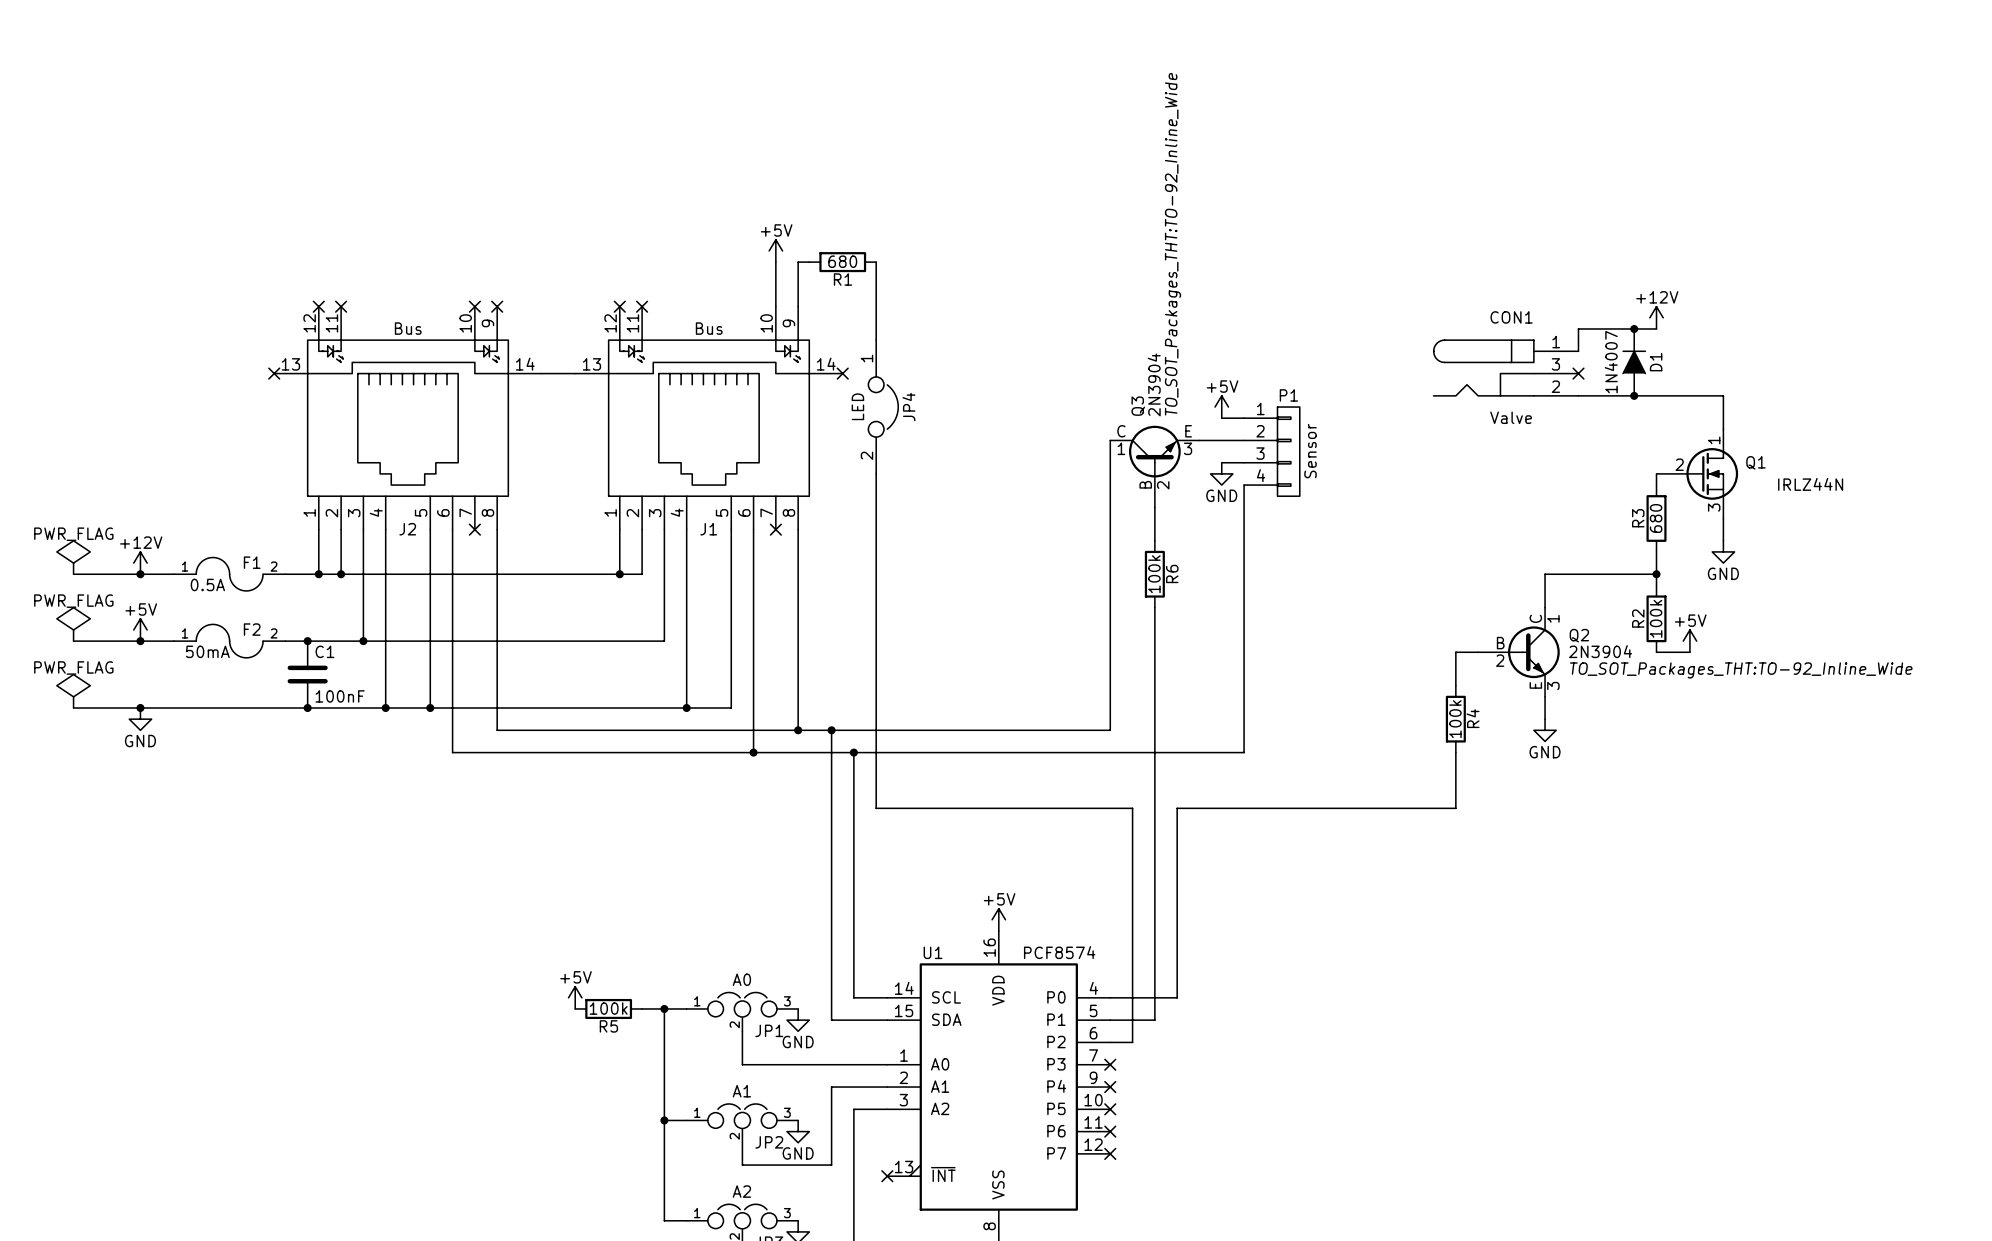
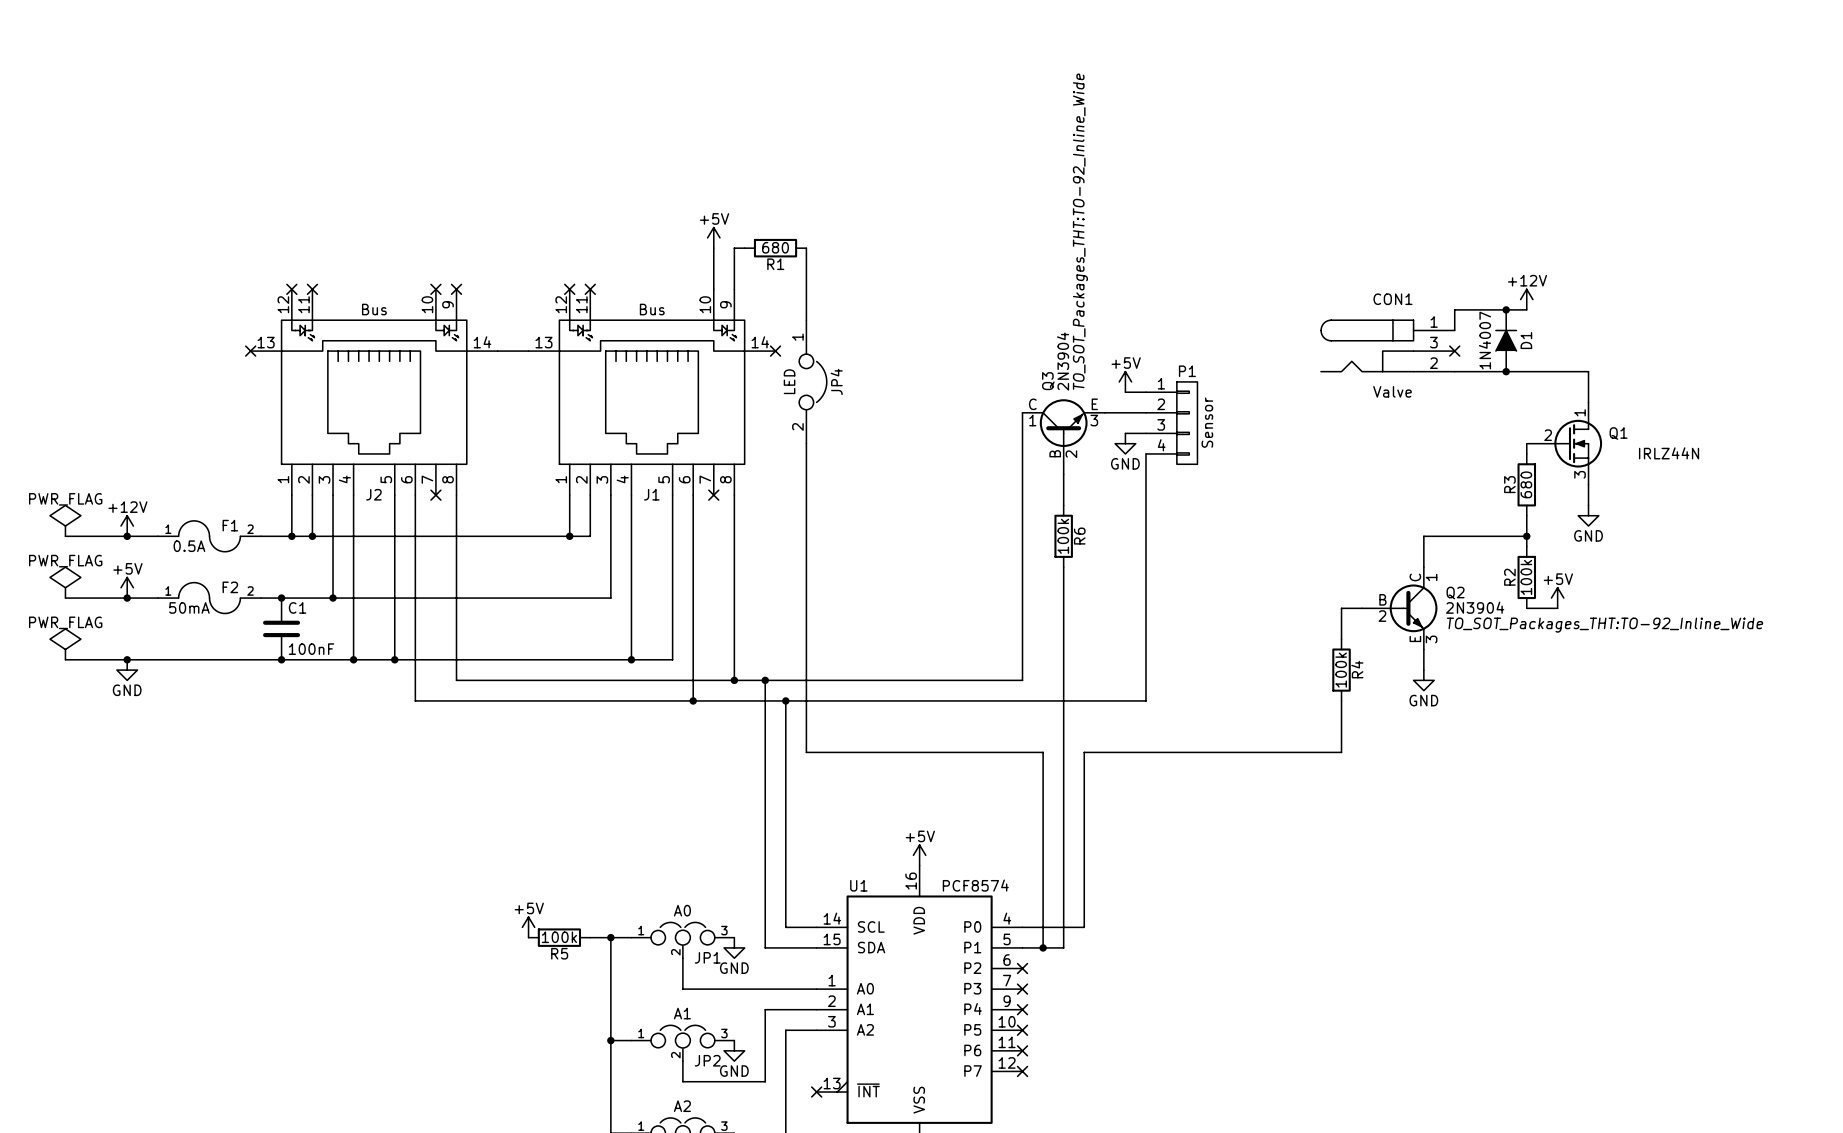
wire: (1132, 1020) (1132, 1042) (1110, 1042) -> none
junction: none -> (1043, 947)
no-connect mark: none -> (1022, 968)

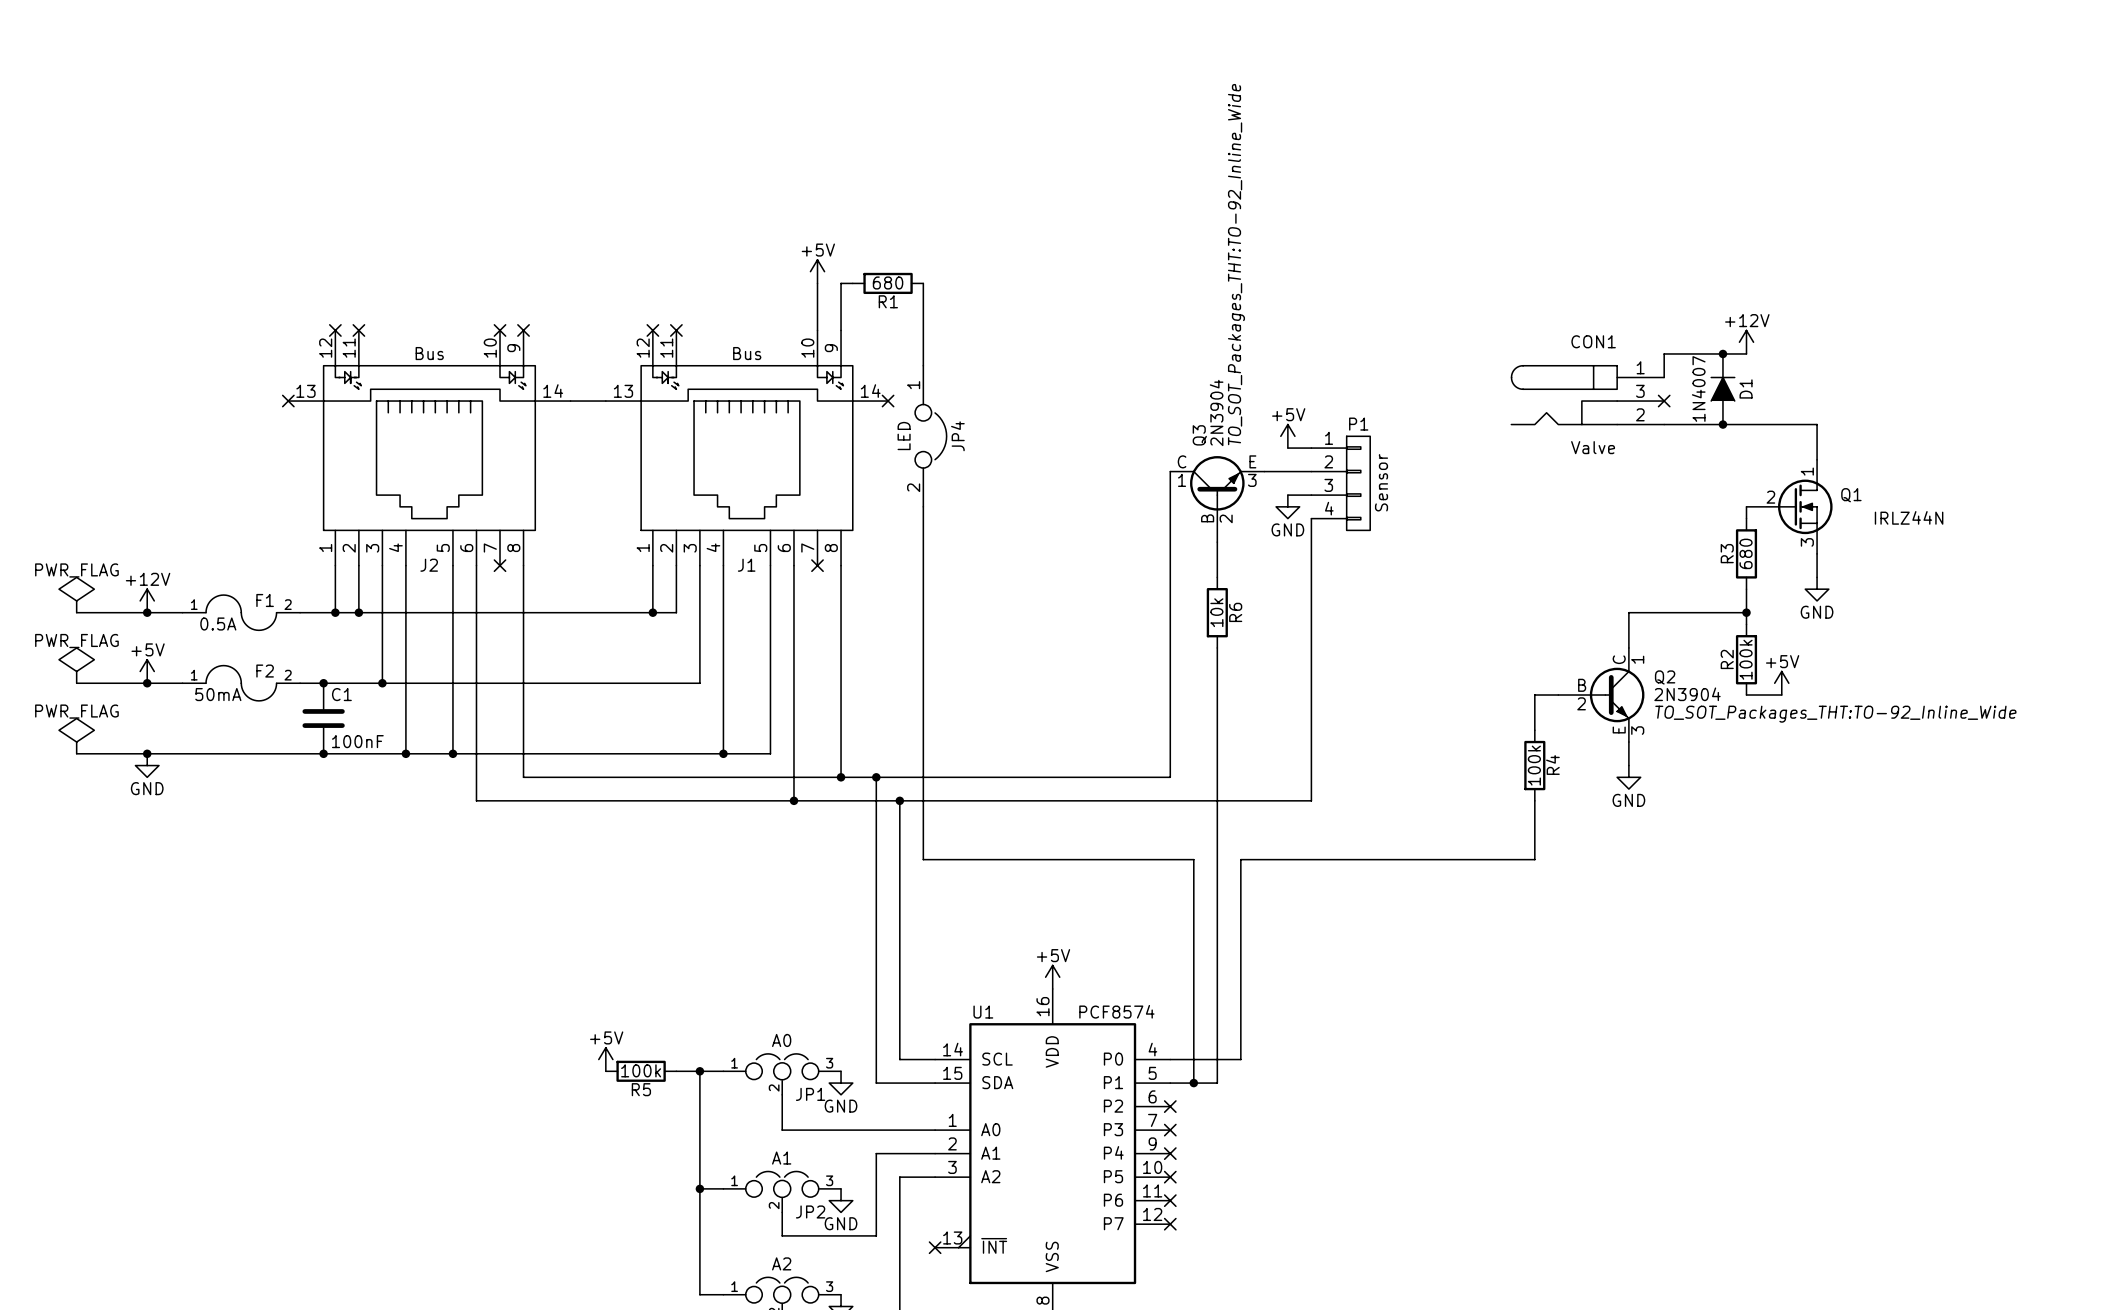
R6 value: 100k (1063, 536) -> 10k (1216, 612)

